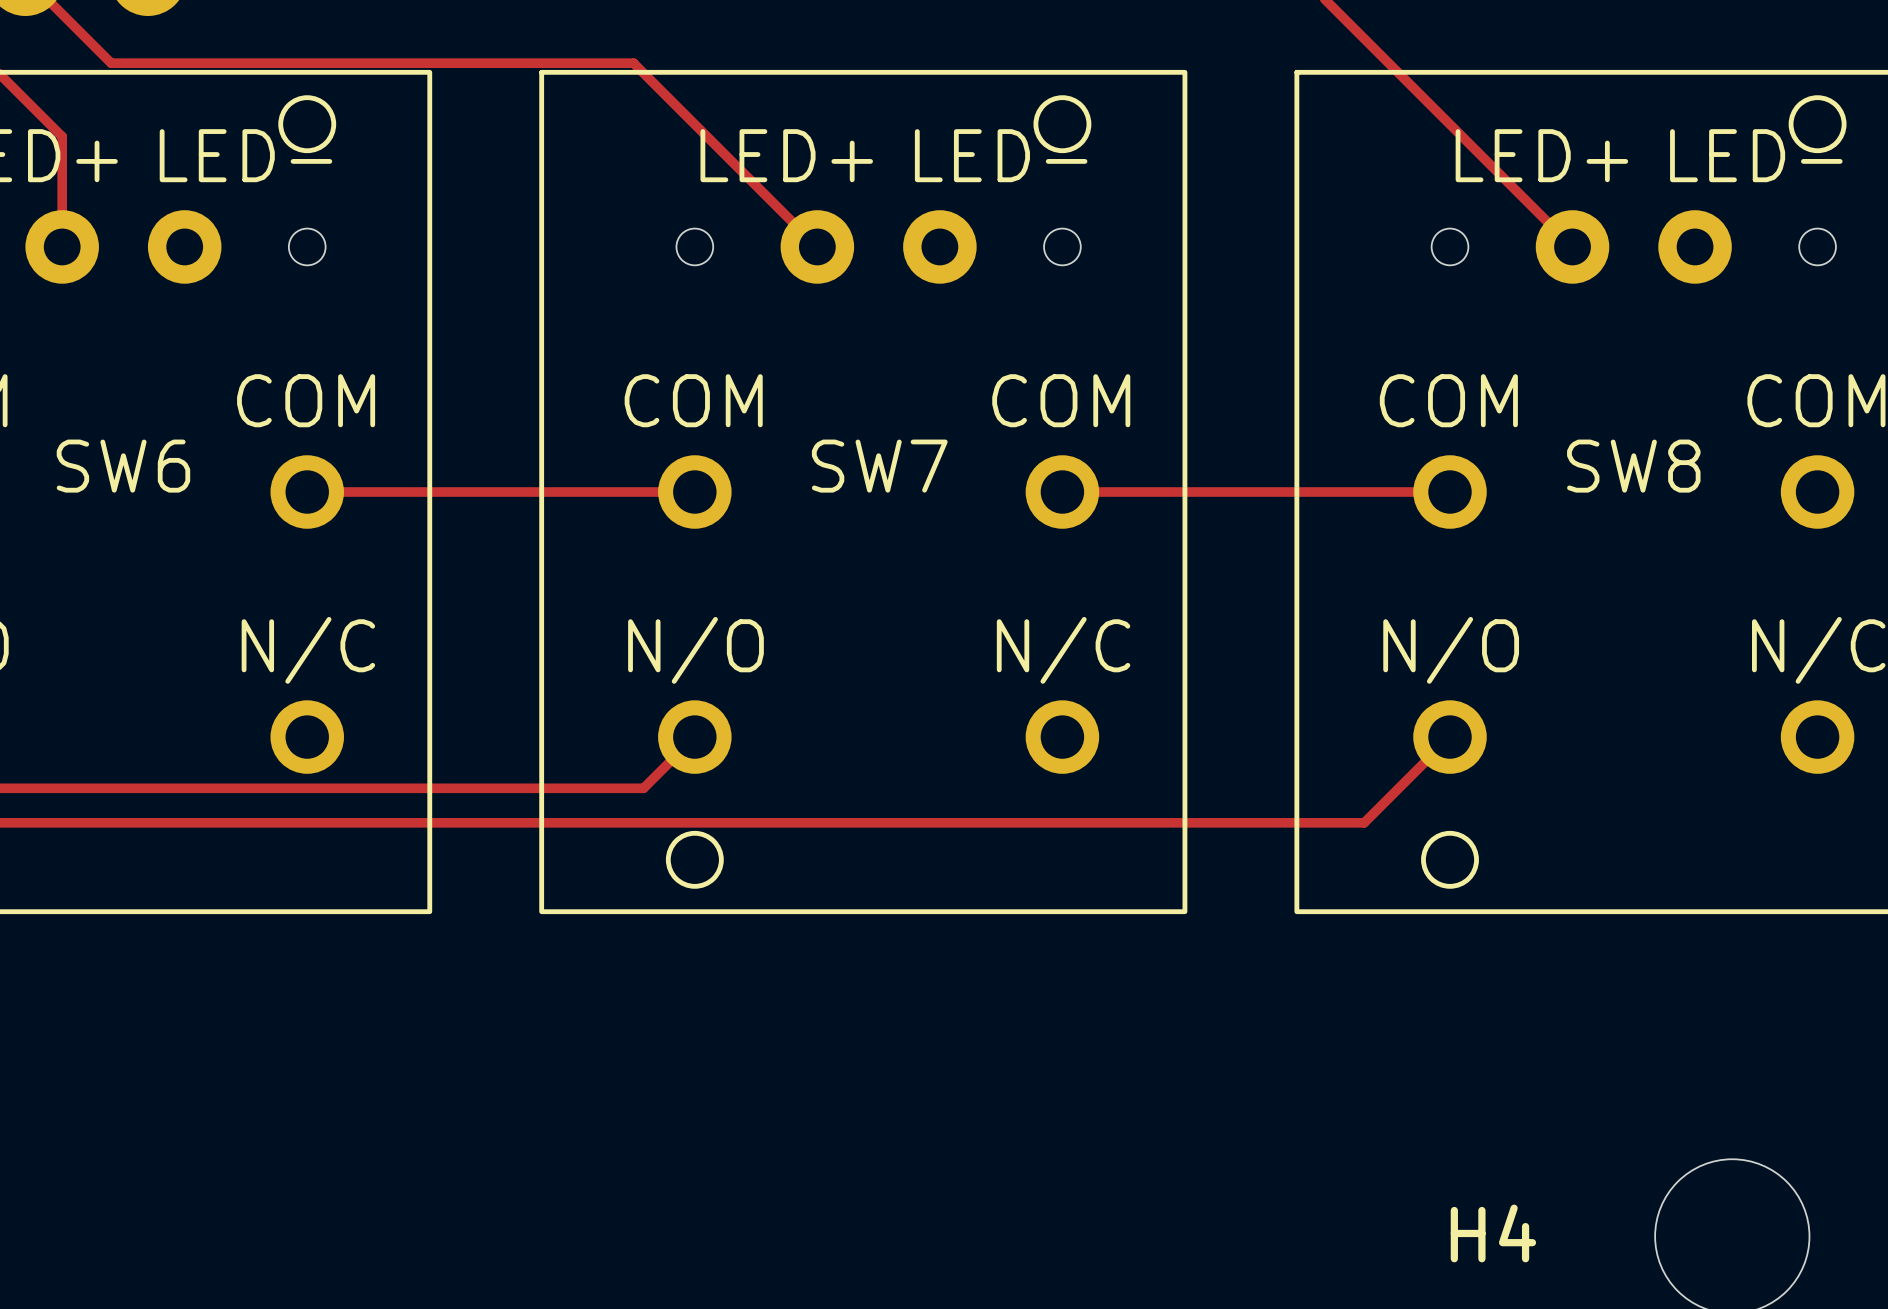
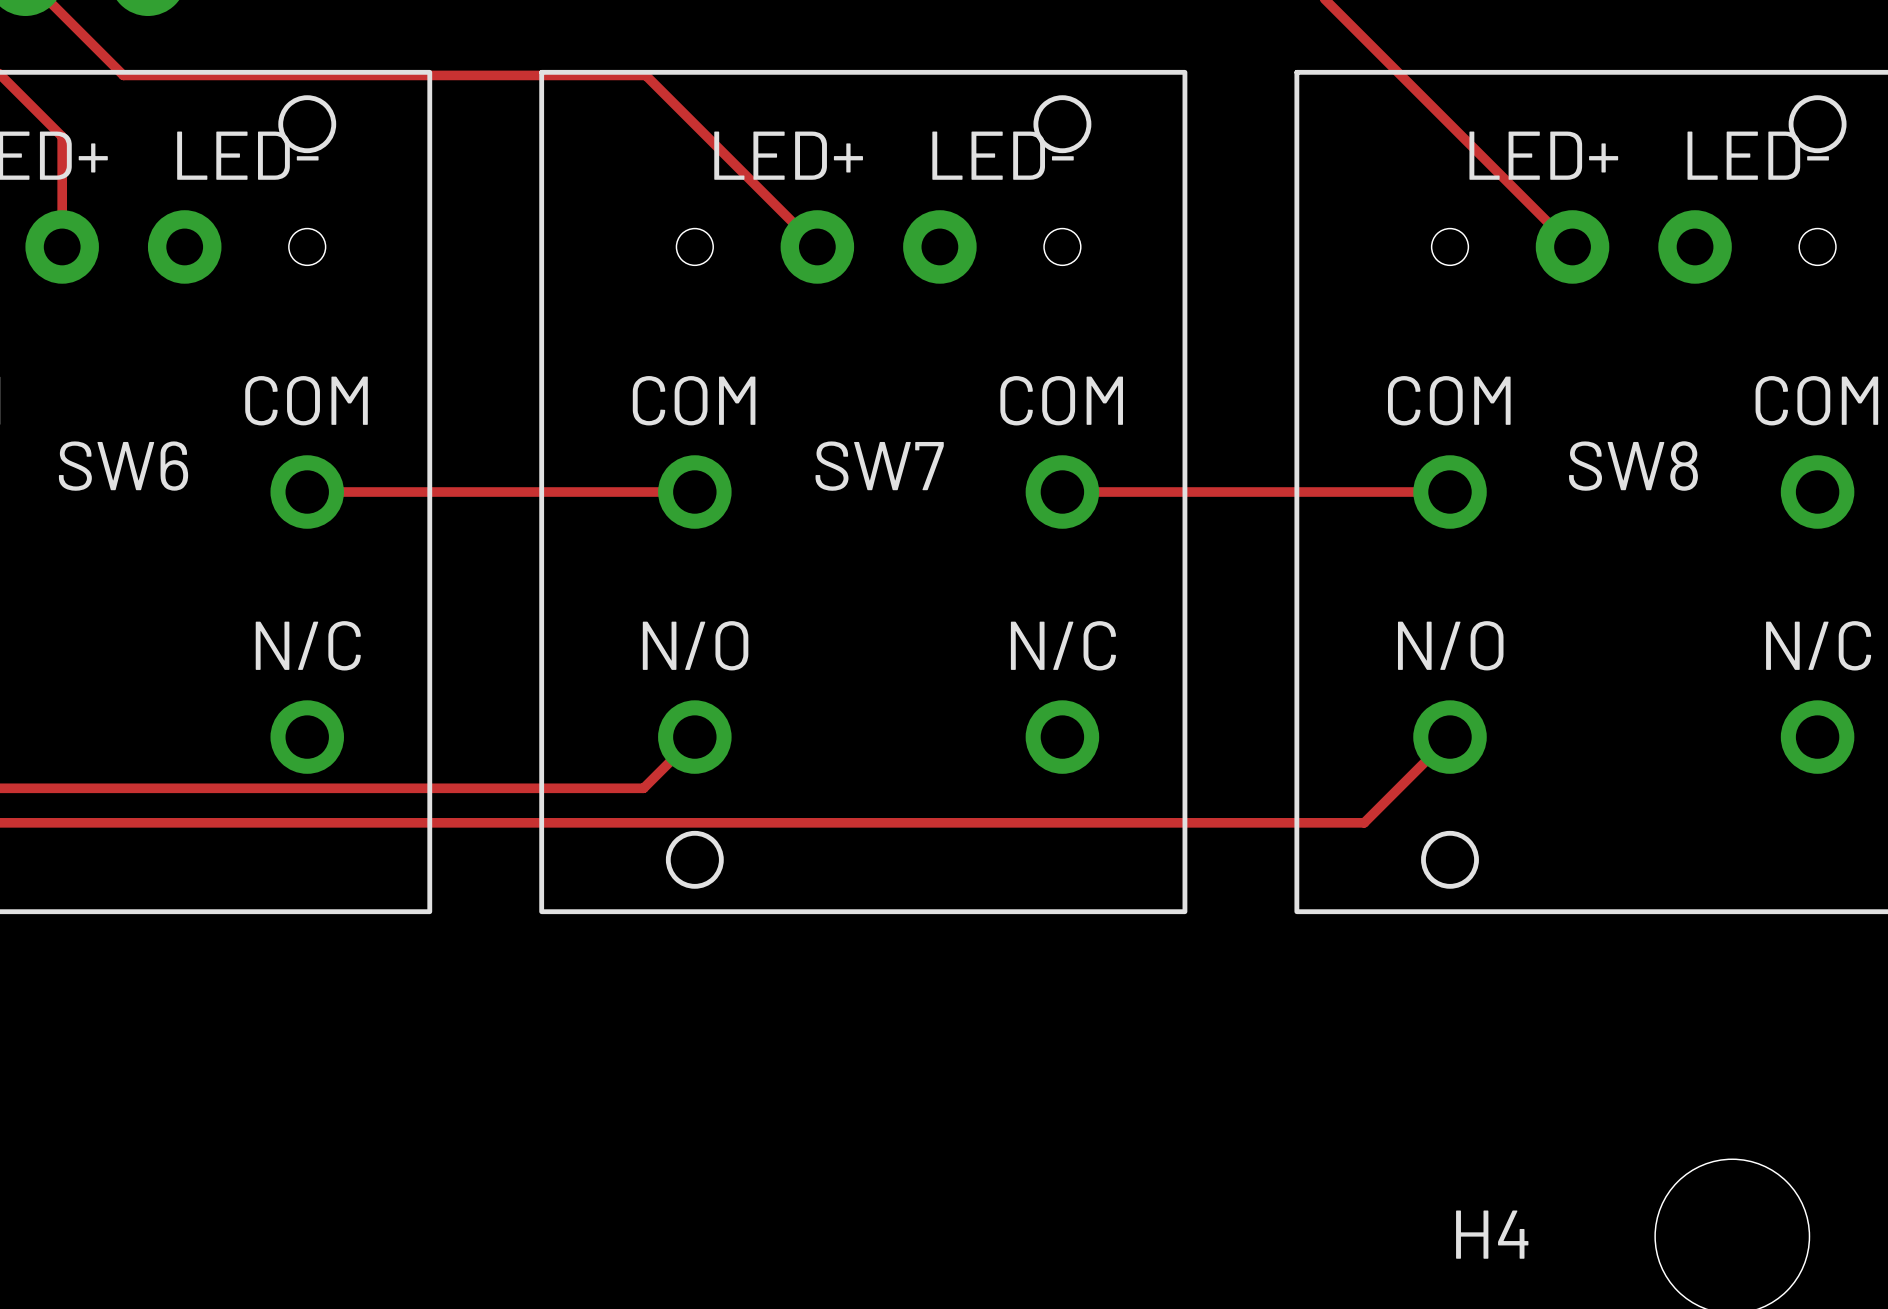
track: (111, 63) (633, 63) (645, 75) -> (111, 63) (123, 75) (645, 75)

